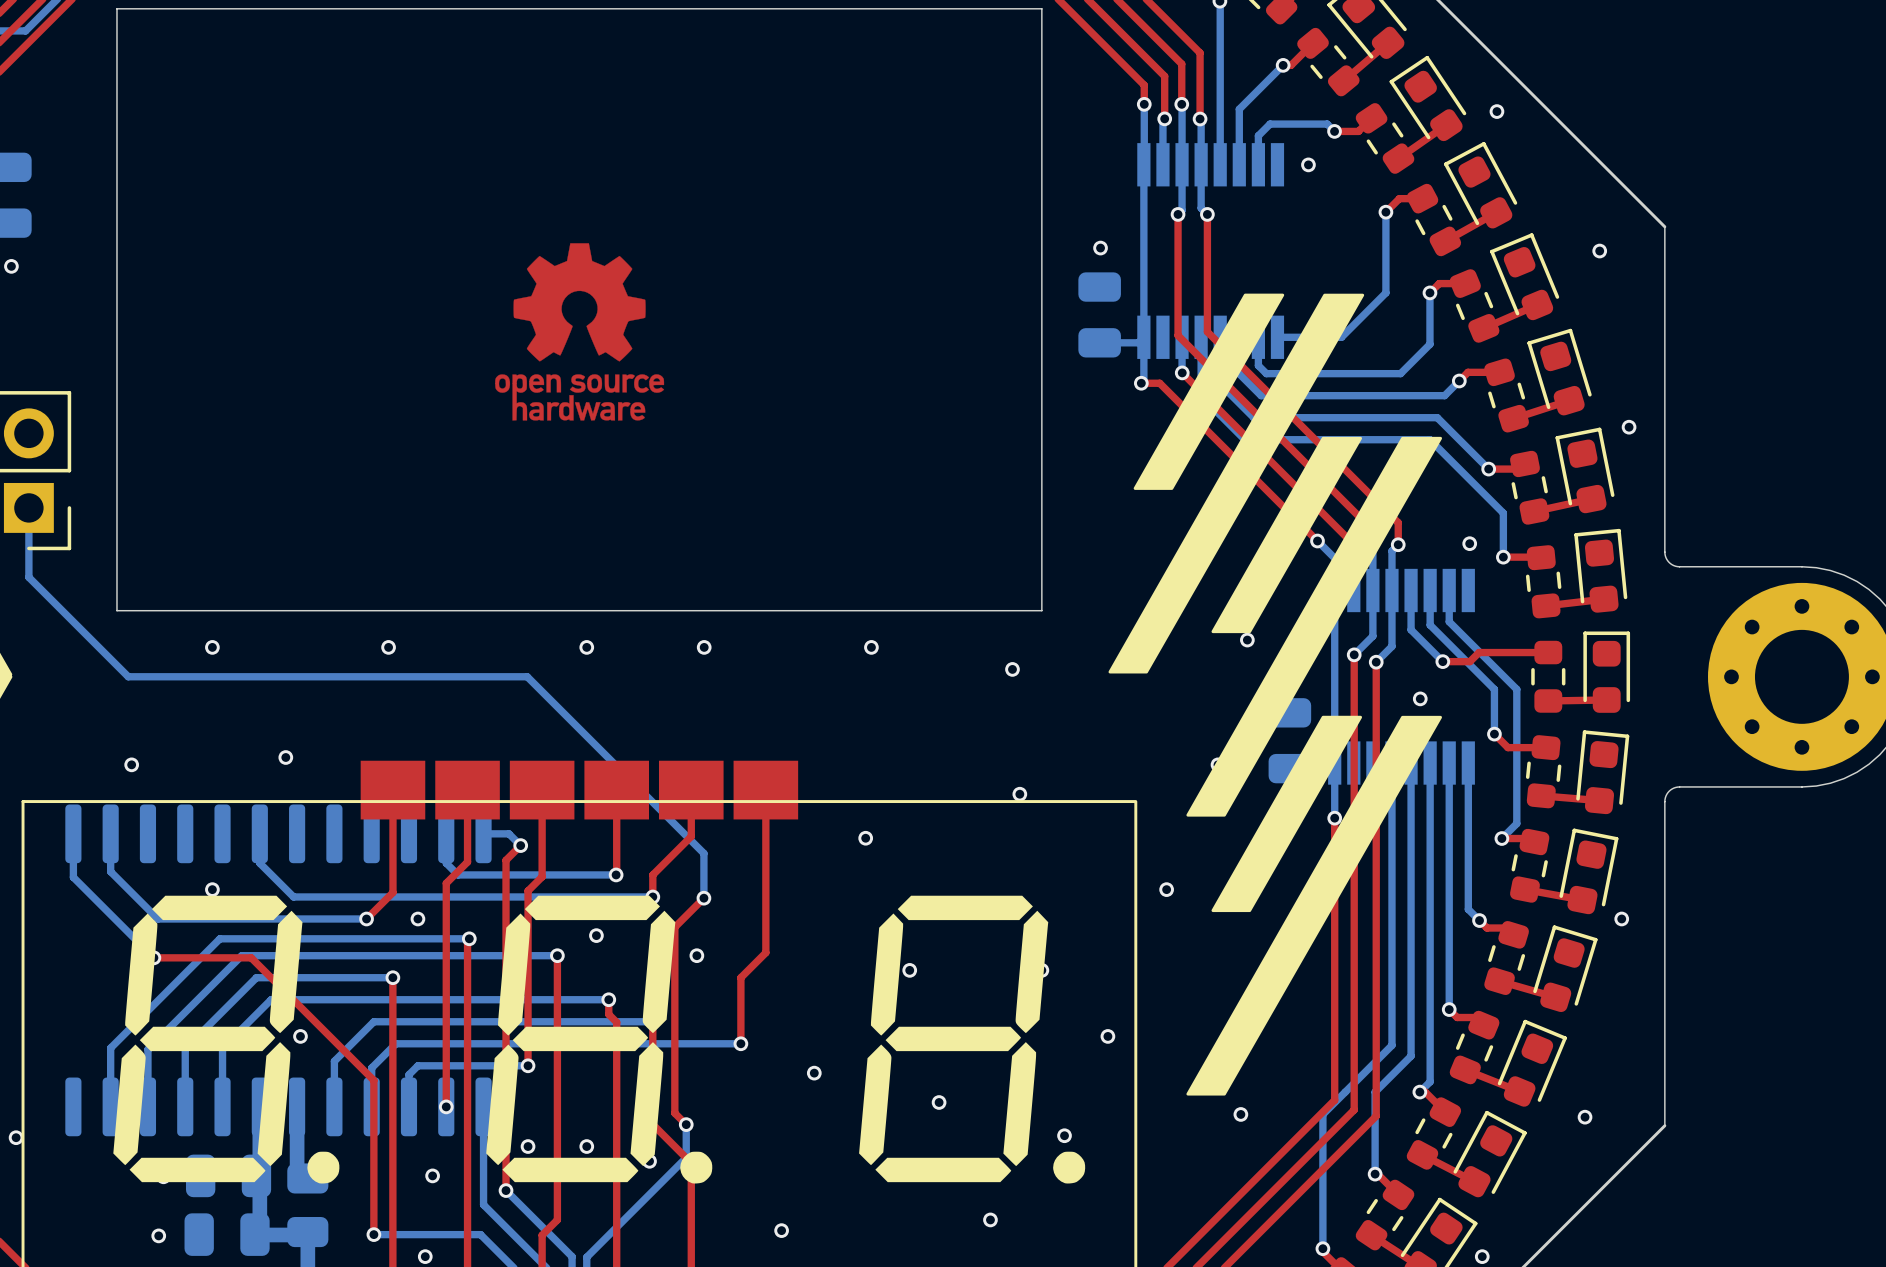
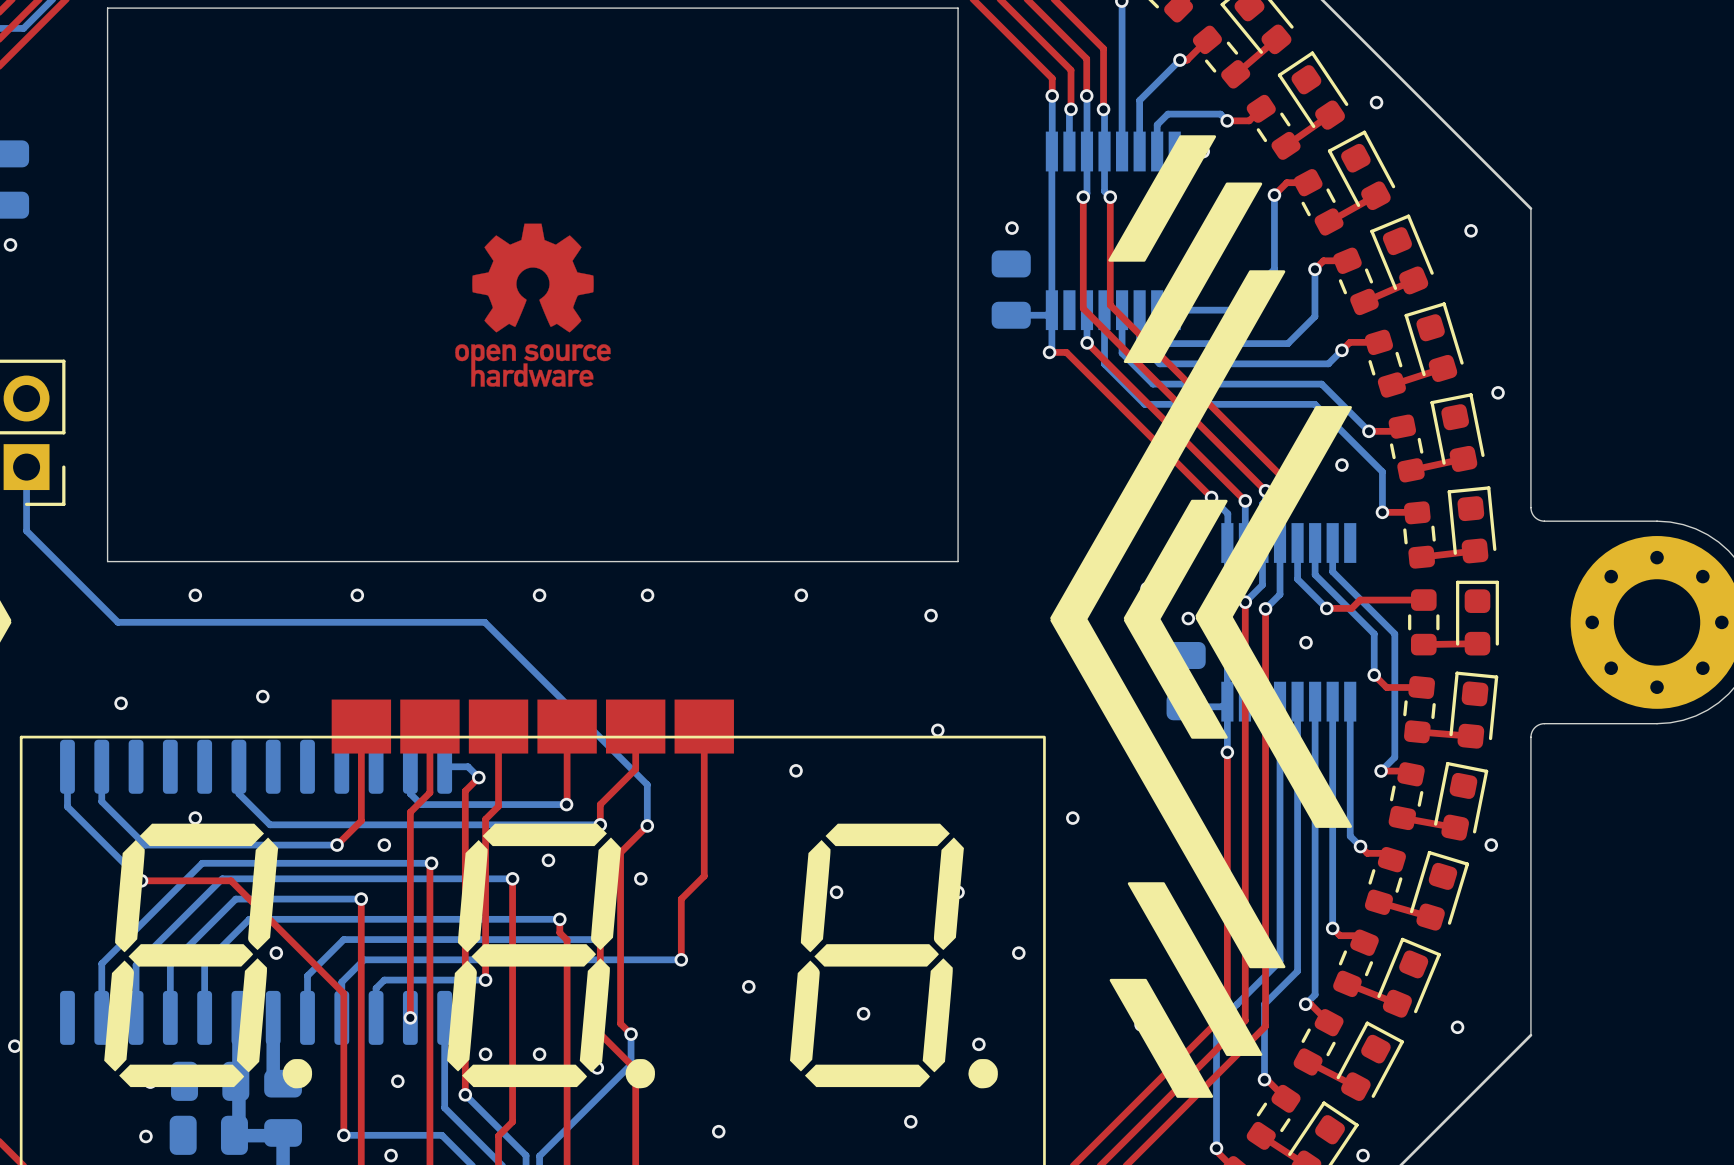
drawing: none -> [1050, 135, 1352, 1098]
drawing: [1108, 293, 1443, 1096] -> none
via position: (1469, 543) -> (1341, 465)

